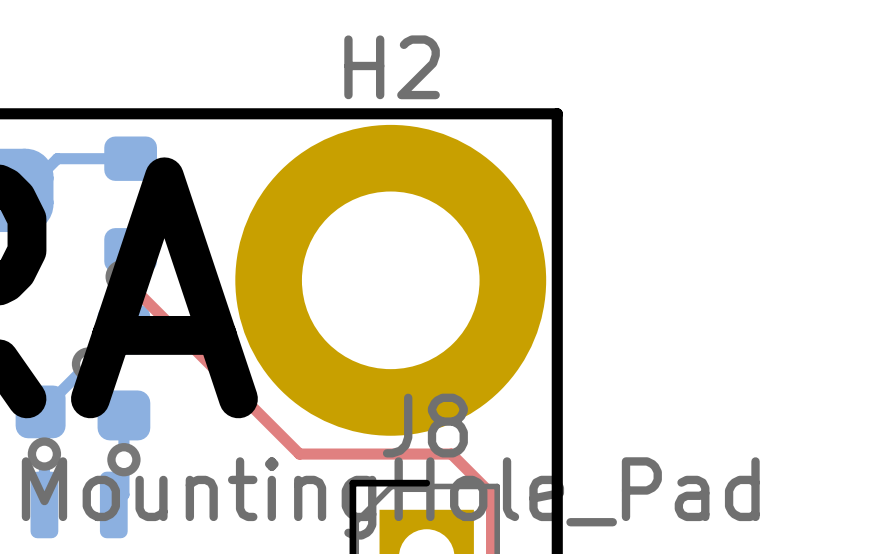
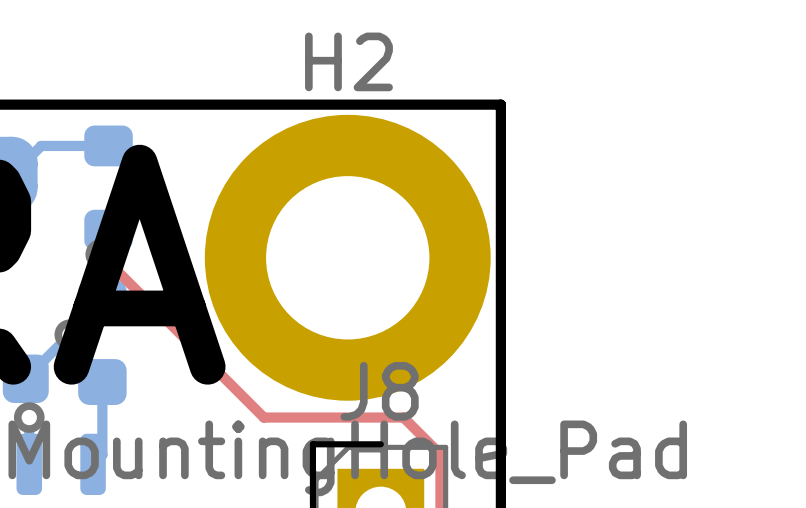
via: (123, 459) -> none

